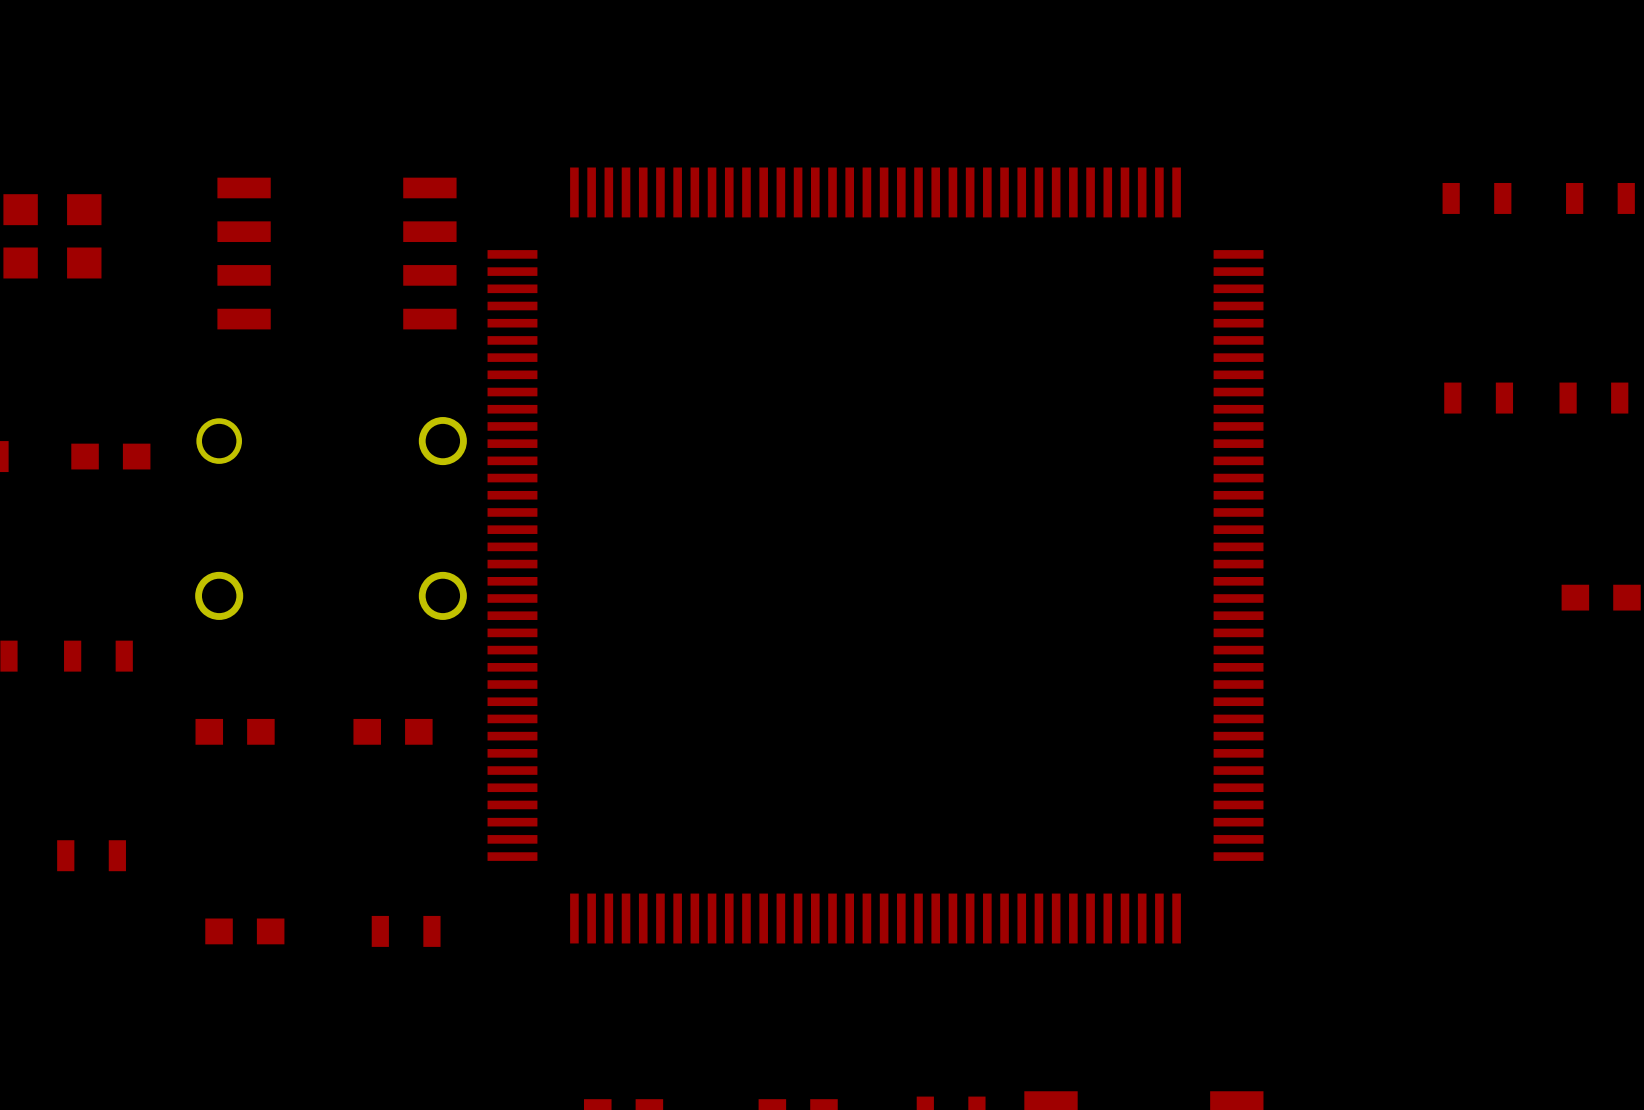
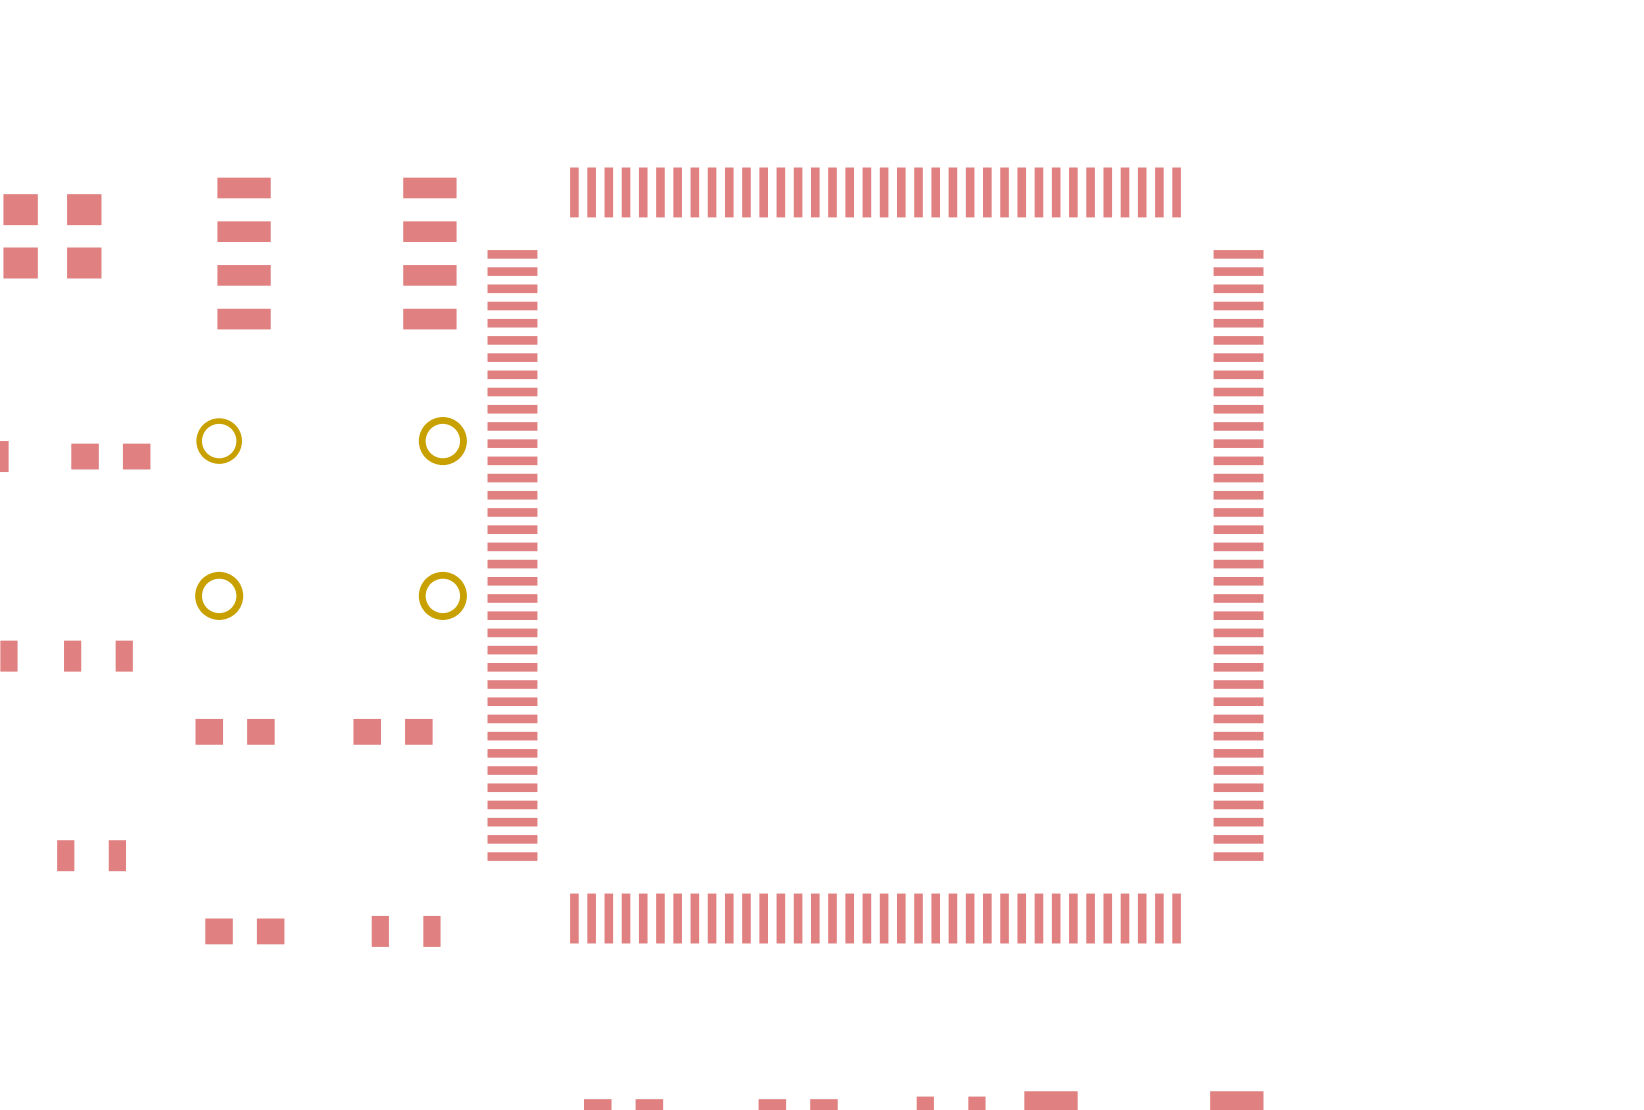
part: (1476, 198) -> none
part: (1600, 198) -> none
part: (1478, 398) -> none
part: (1593, 398) -> none
part: (1601, 597) -> none

